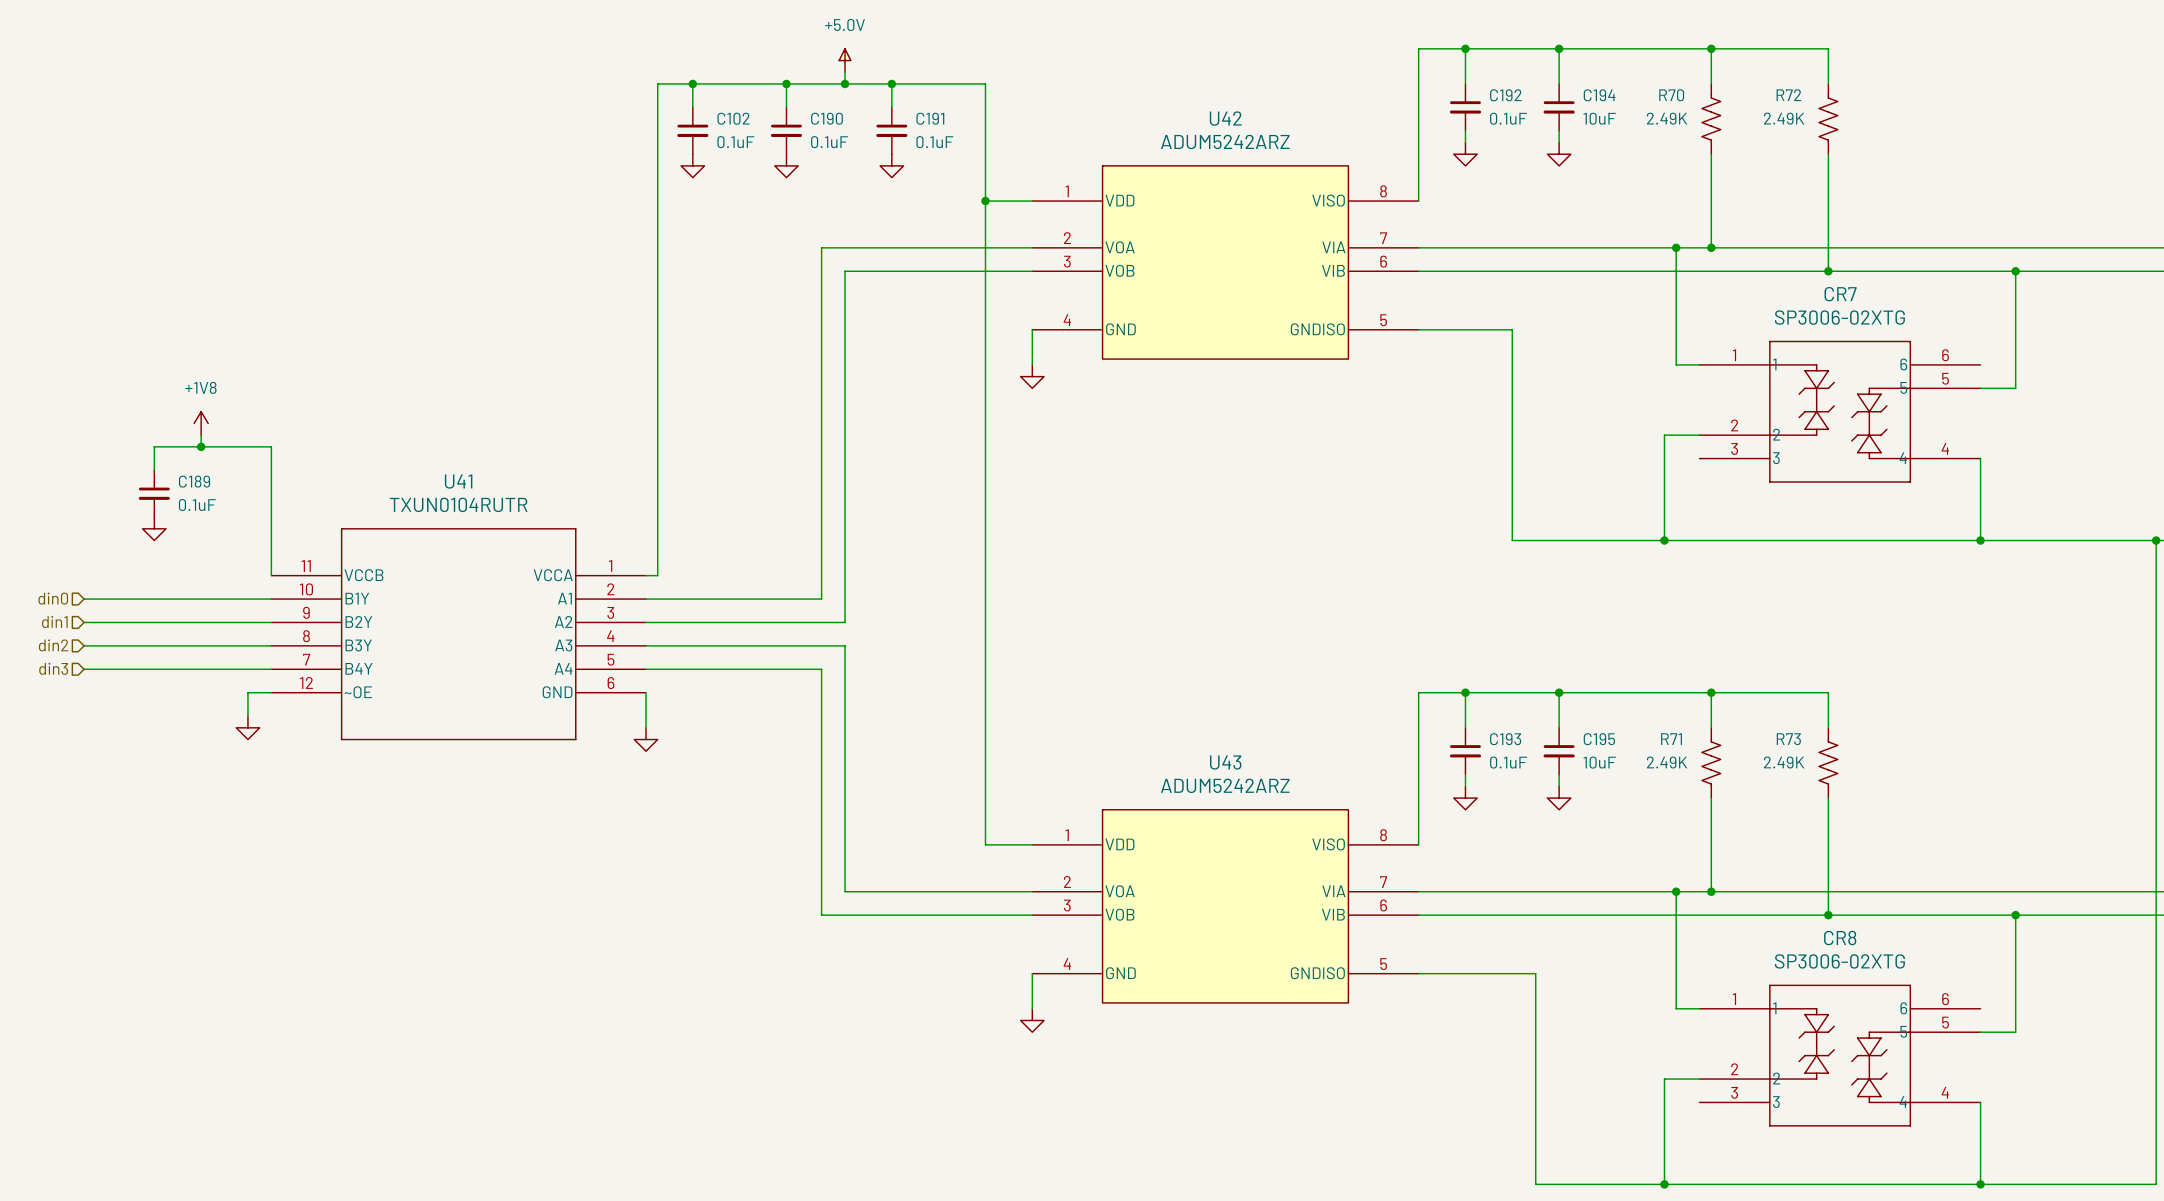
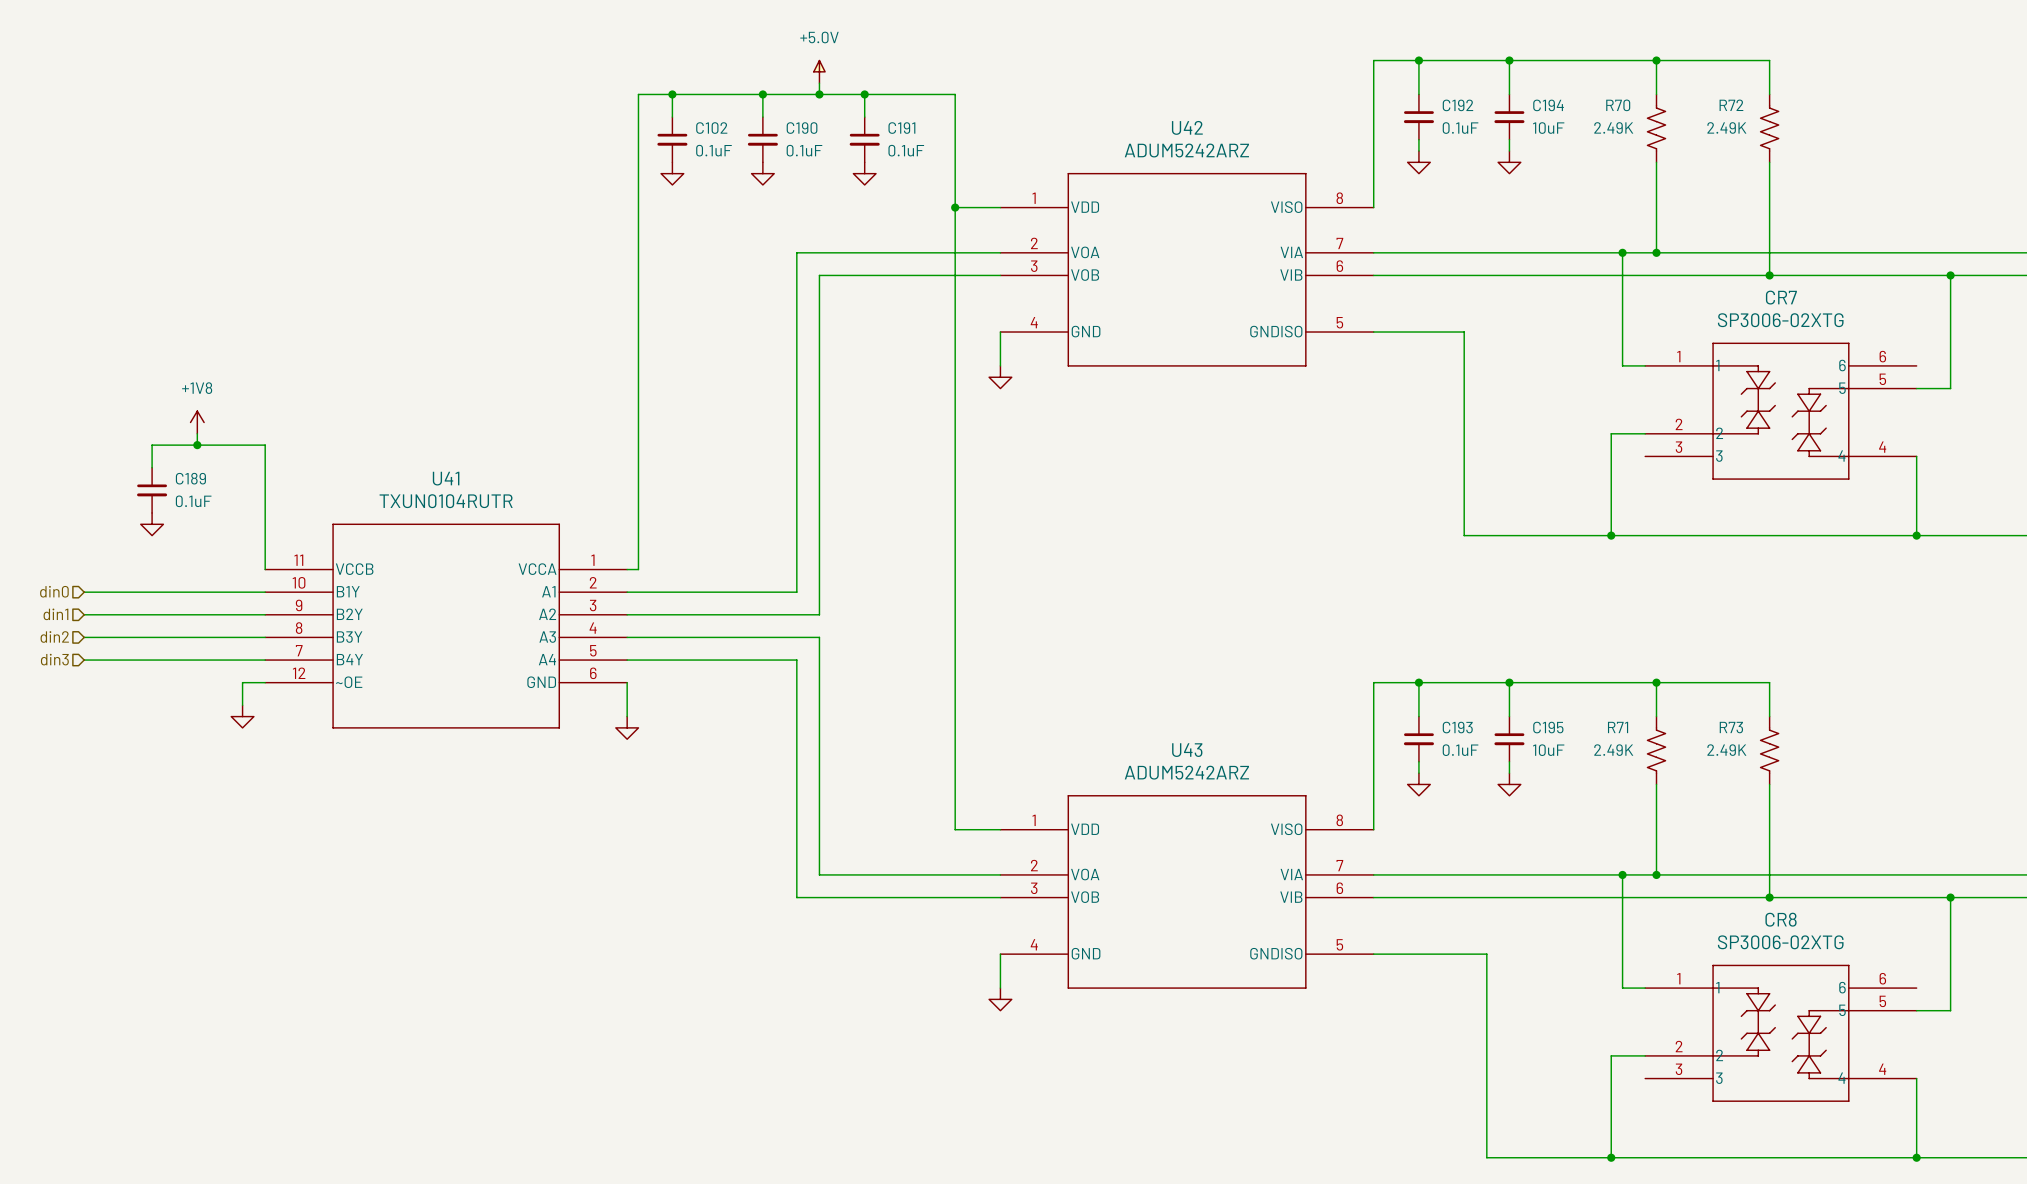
U42 symbol: [1032, 165, 1419, 360] -> [1000, 173, 1374, 367]
U43 symbol: [1032, 809, 1419, 1003] -> [1000, 795, 1374, 989]

